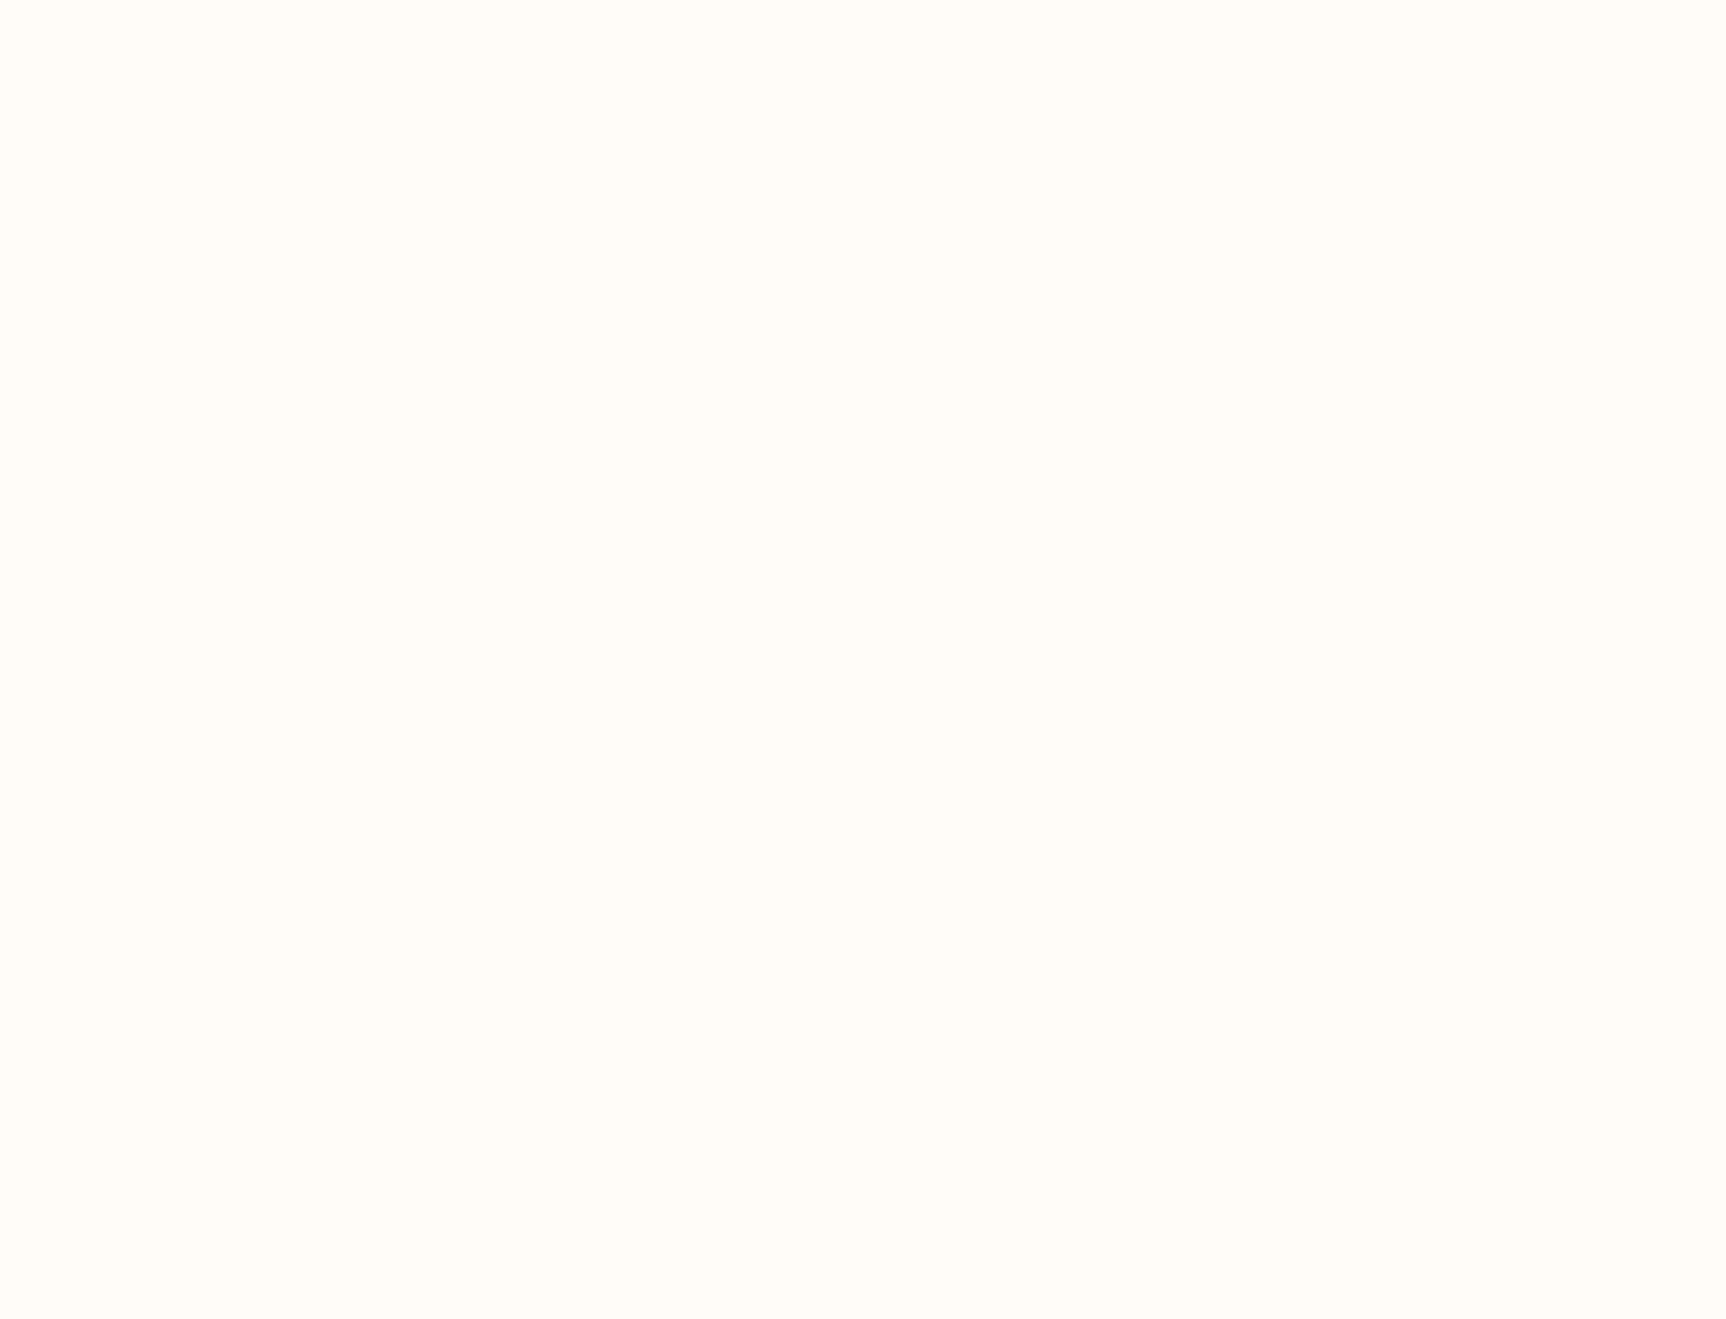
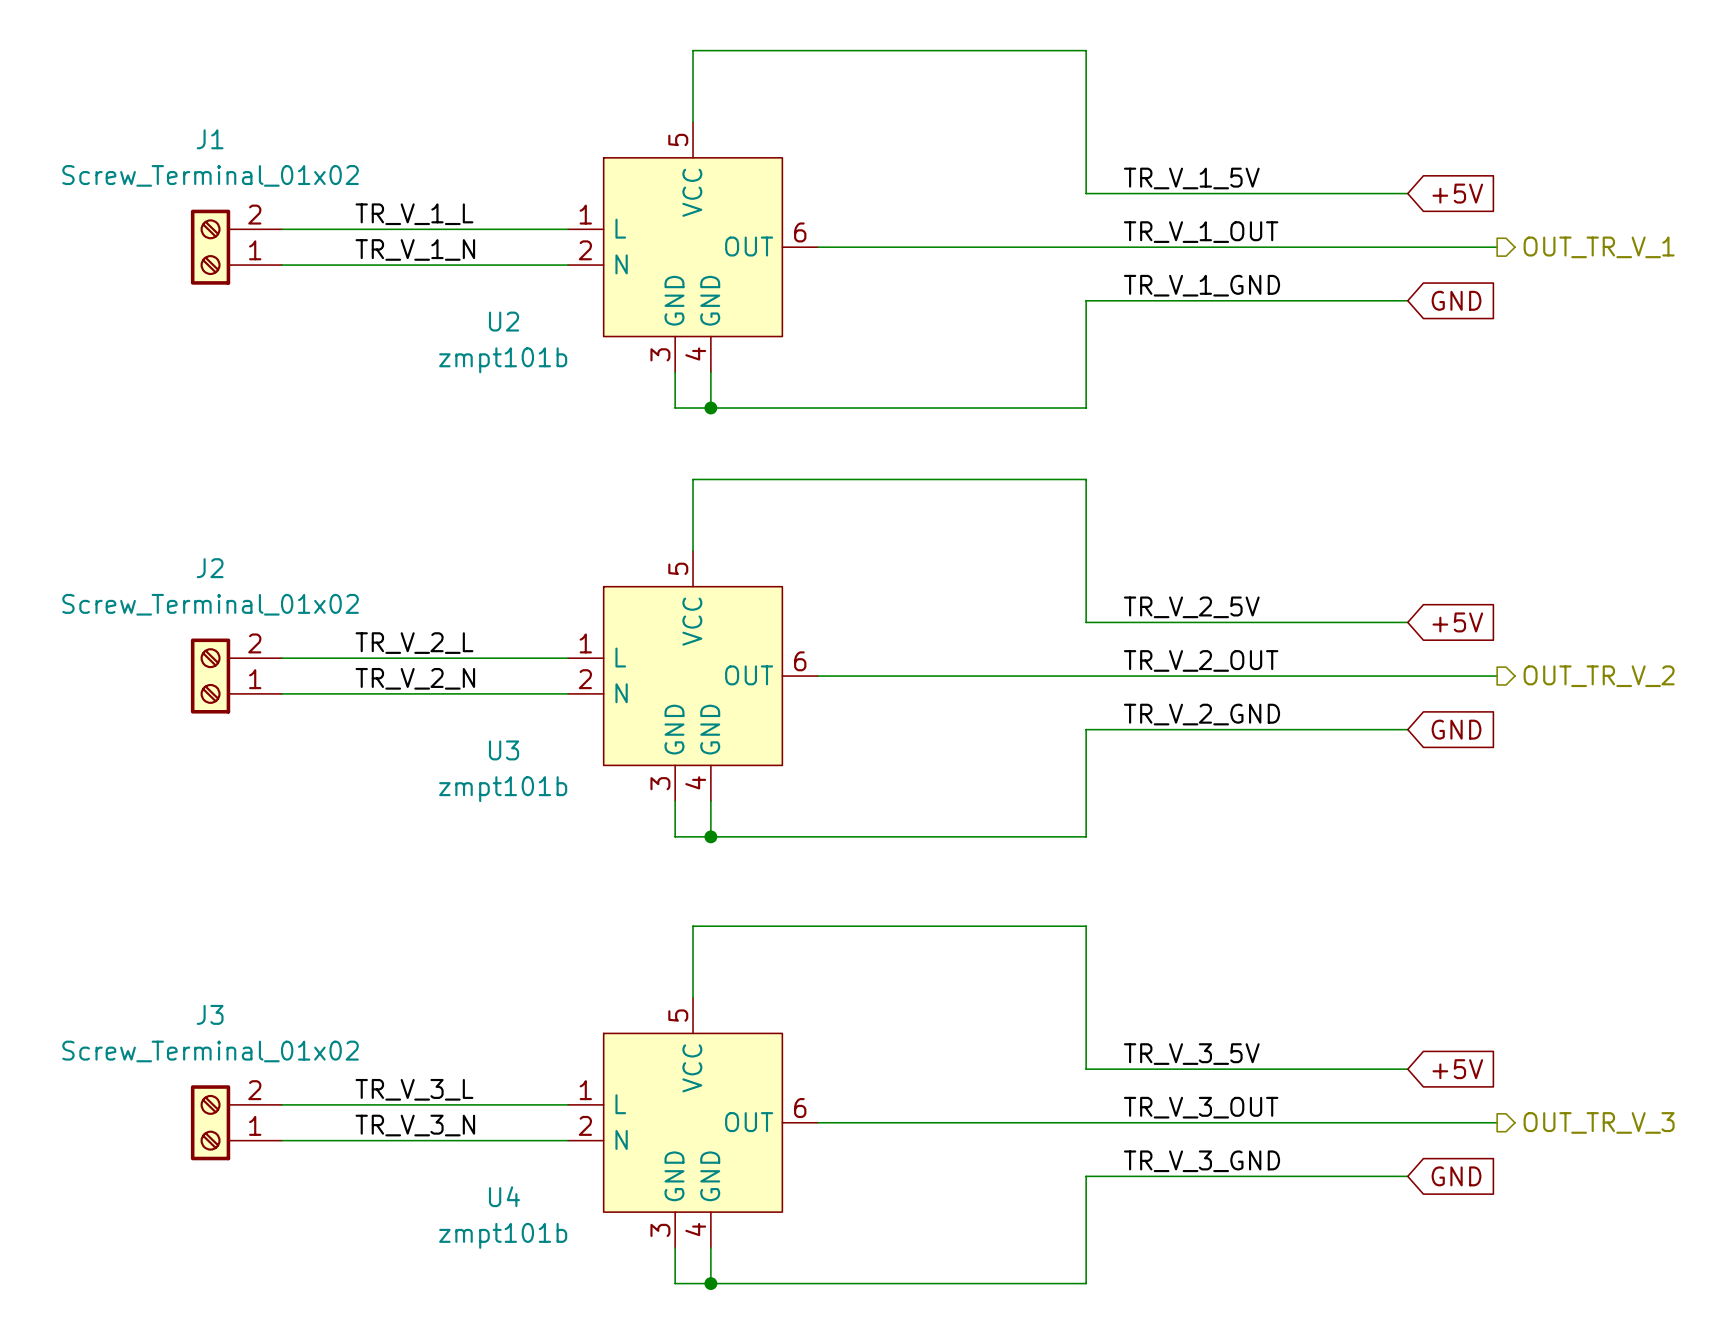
wire: none -> (693, 122) (693, 50) (1086, 50) (1086, 193) (1407, 193)
label: none -> TR_V_1_5V (1191, 178)
global label: none -> +5V (1457, 193)
U2: none -> zmpt101b (791, 202)
label: none -> TR_V_1_L (414, 214)
wire: none -> (282, 229) (567, 229)
label: none -> TR_V_1_OUT (1201, 232)
J1: none -> Screw_Terminal_01x02 (236, 247)
wire: none -> (818, 247) (1497, 247)
hierarchical label: none -> OUT_TR_V_1 (1599, 247)
label: none -> TR_V_1_N (415, 249)
wire: none -> (282, 265) (567, 265)
label: none -> TR_V_1_GND (1201, 285)
wire: none -> (1407, 300) (1086, 300) (1086, 408) (675, 408) (675, 372)
global label: none -> GND (1456, 300)
wire: none -> (710, 372) (710, 408)
junction: none -> (710, 408)
wire: none -> (693, 550) (693, 479) (1086, 479) (1086, 622) (1407, 622)
label: none -> TR_V_2_5V (1191, 607)
global label: none -> +5V (1457, 622)
U3: none -> zmpt101b (791, 631)
label: none -> TR_V_2_L (414, 643)
wire: none -> (282, 658) (567, 658)
label: none -> TR_V_2_OUT (1201, 660)
J2: none -> Screw_Terminal_01x02 (236, 676)
wire: none -> (818, 676) (1497, 676)
hierarchical label: none -> OUT_TR_V_2 (1599, 676)
label: none -> TR_V_2_N (415, 678)
wire: none -> (282, 693) (567, 693)
label: none -> TR_V_2_GND (1201, 714)
wire: none -> (1407, 729) (1086, 729) (1086, 836) (675, 836) (675, 801)
global label: none -> GND (1456, 729)
wire: none -> (710, 801) (710, 836)
junction: none -> (710, 836)
wire: none -> (693, 997) (693, 926) (1086, 926) (1086, 1069) (1407, 1069)
label: none -> TR_V_3_5V (1191, 1054)
global label: none -> +5V (1457, 1069)
U4: none -> zmpt101b (791, 1078)
label: none -> TR_V_3_L (414, 1089)
wire: none -> (282, 1104) (567, 1104)
label: none -> TR_V_3_OUT (1201, 1107)
J3: none -> Screw_Terminal_01x02 (236, 1122)
wire: none -> (818, 1122) (1497, 1122)
hierarchical label: none -> OUT_TR_V_3 (1599, 1122)
label: none -> TR_V_3_N (415, 1125)
wire: none -> (282, 1140) (567, 1140)
label: none -> TR_V_3_GND (1201, 1161)
wire: none -> (1407, 1176) (1086, 1176) (1086, 1283) (675, 1283) (675, 1247)
global label: none -> GND (1456, 1176)
wire: none -> (710, 1247) (710, 1283)
junction: none -> (710, 1283)

